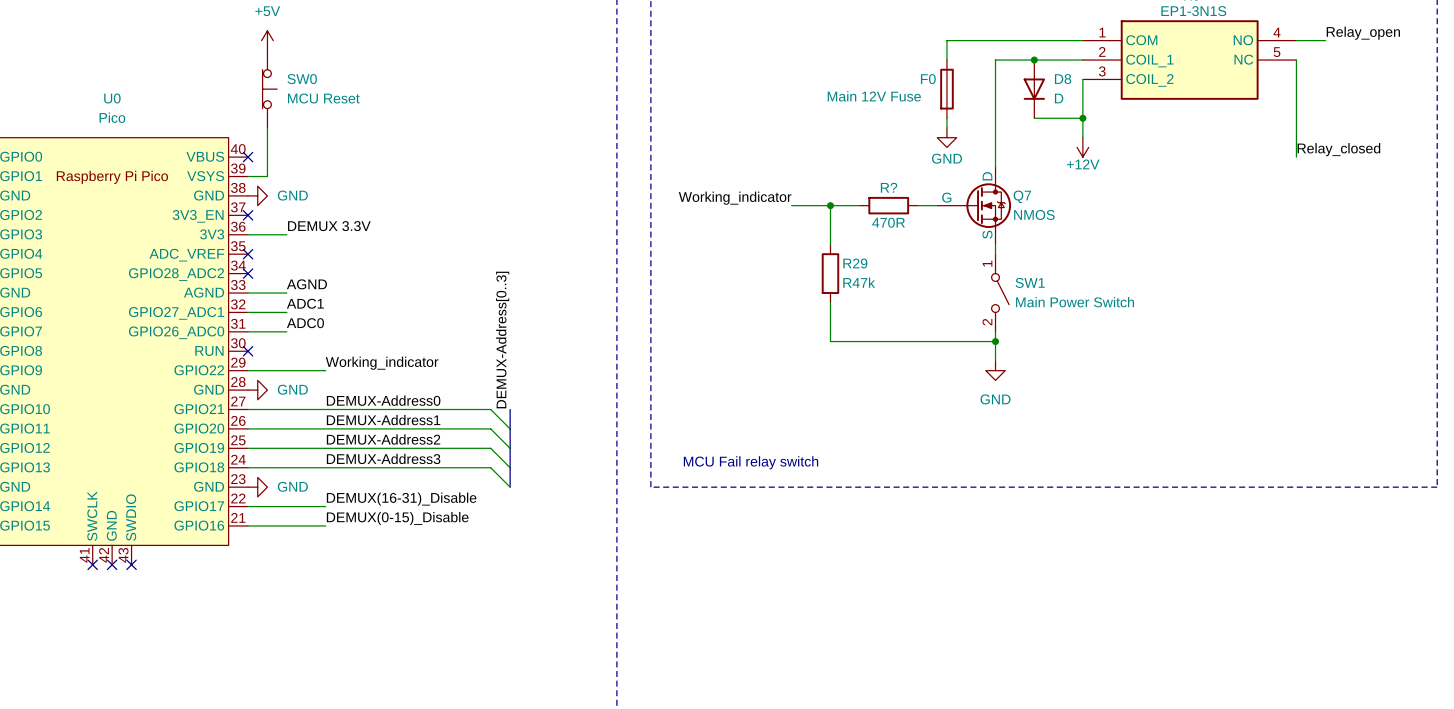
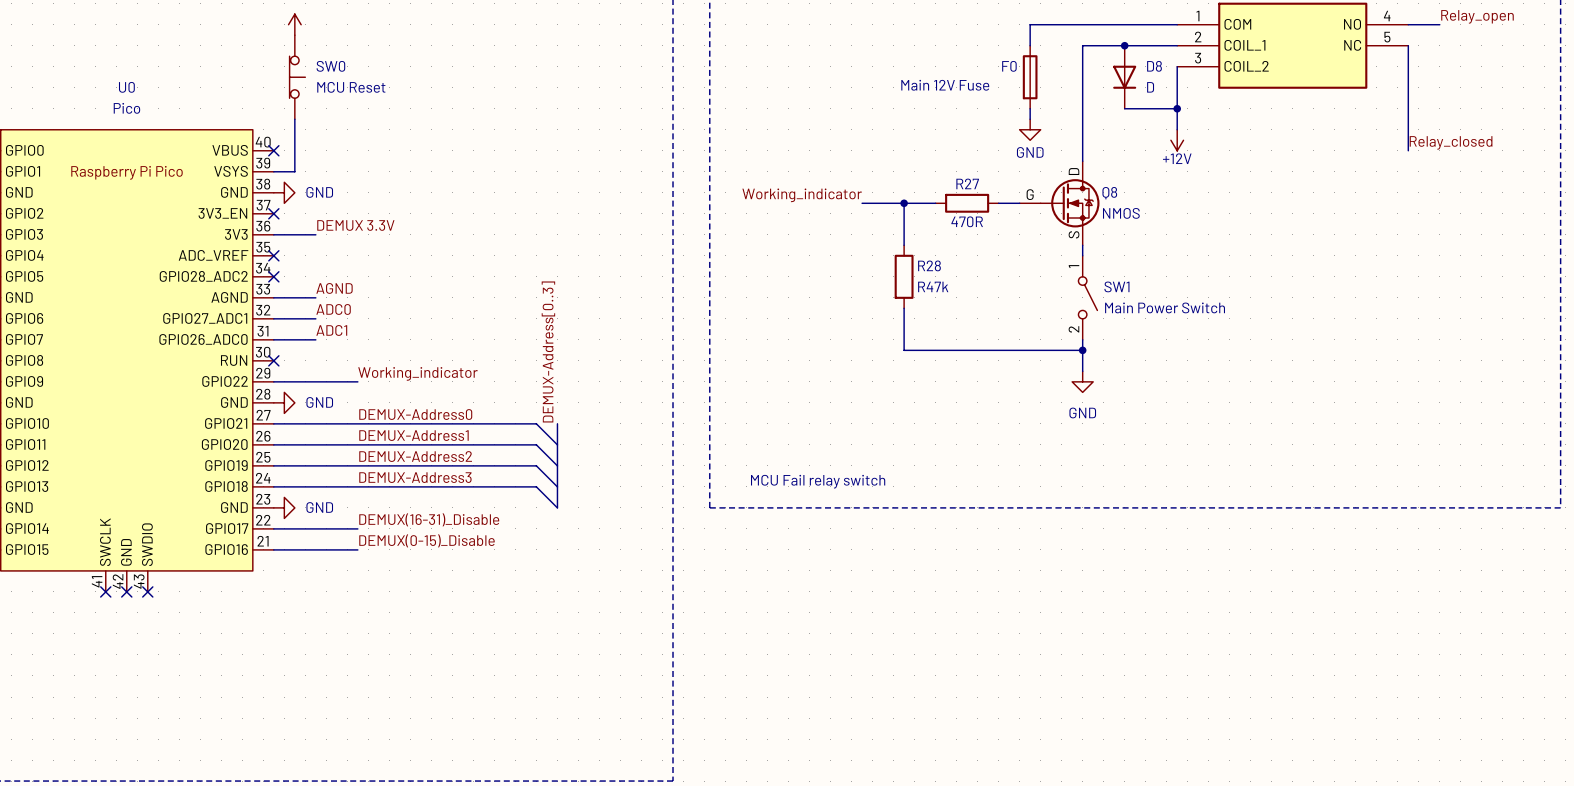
R? name: R? (889, 187) -> R27 (967, 183)
Q7 name: Q7 (1022, 196) -> Q8 (1109, 193)
R29 name: R29 (855, 263) -> R28 (929, 265)
label: ADC1 (305, 303) -> ADC0 (333, 309)
label: ADC0 (305, 323) -> ADC1 (331, 330)

